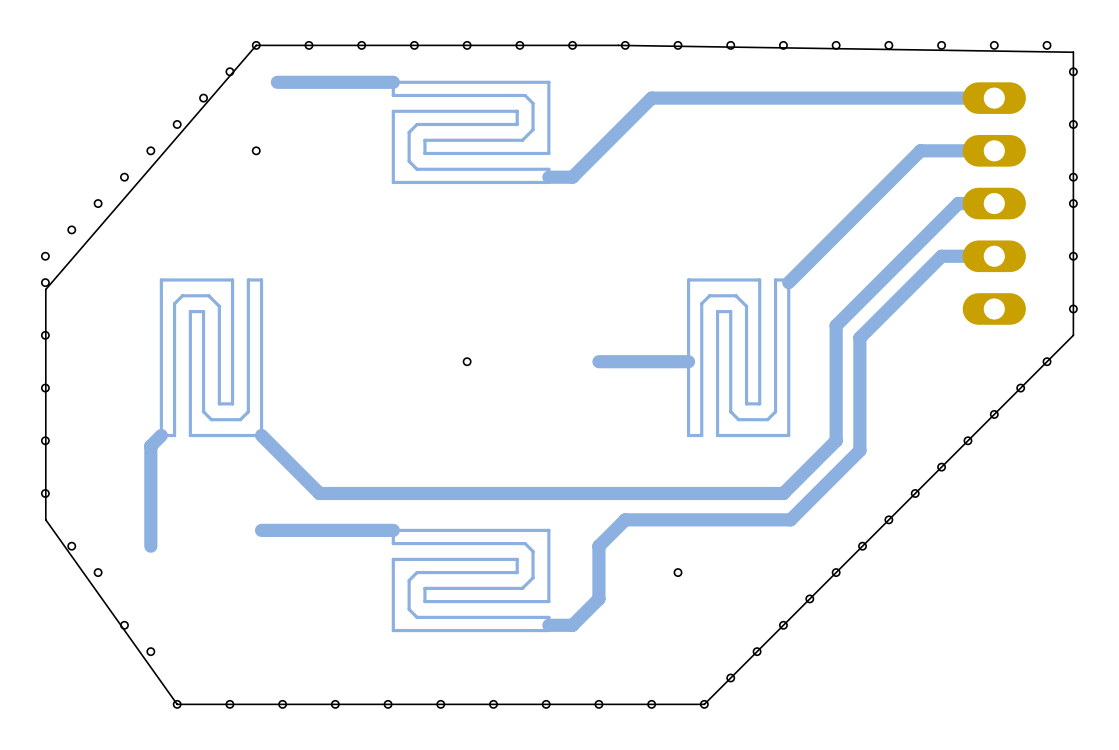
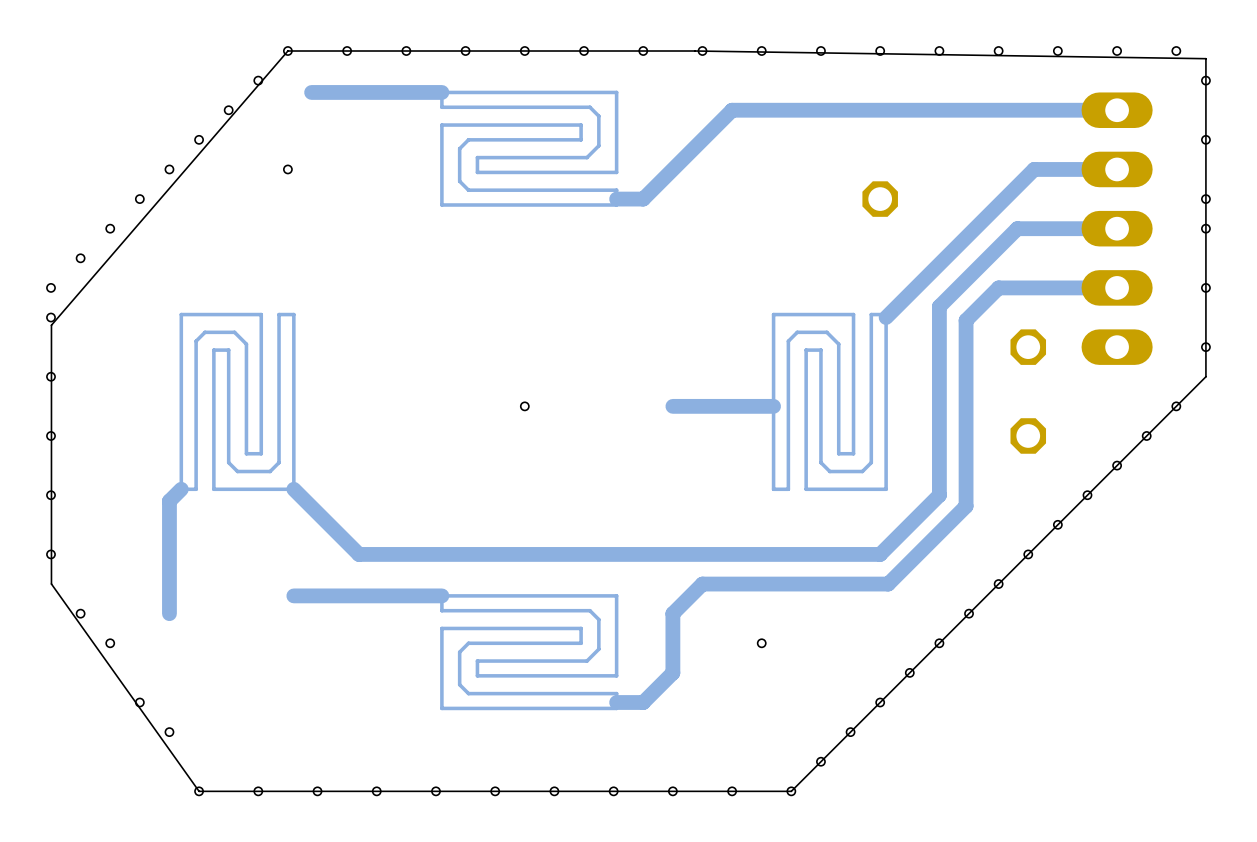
part: none -> (880, 199)
bottom track: (958, 203) (836, 325) -> (1076, 228) (1017, 228) (939, 306) (939, 365)
bottom track: (941, 256) (859, 337) -> (1057, 287) (998, 287) (966, 320) (966, 379)
part: none -> (1028, 347)
part: none -> (1028, 435)

